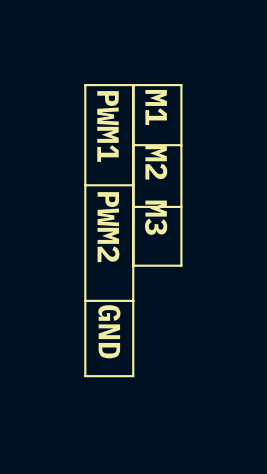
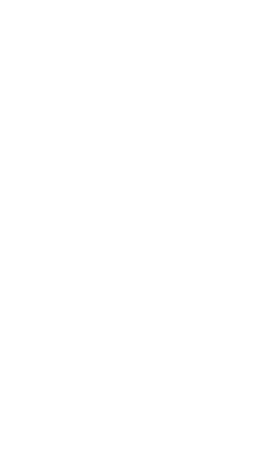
line: (133, 85) (133, 376) (85, 376) (85, 85) (181, 85) (181, 265) (133, 265) (133, 85) -> none
text: PWM1 (107, 126) -> none
line: (133, 145) (181, 145) -> none
text: M1 M2 M3 (156, 162) -> none
line: (85, 185) (133, 185) -> none
line: (133, 206) (181, 206) -> none
text: PWM2 (108, 227) -> none
line: (85, 300) (133, 300) -> none
text: GND (109, 331) -> none

